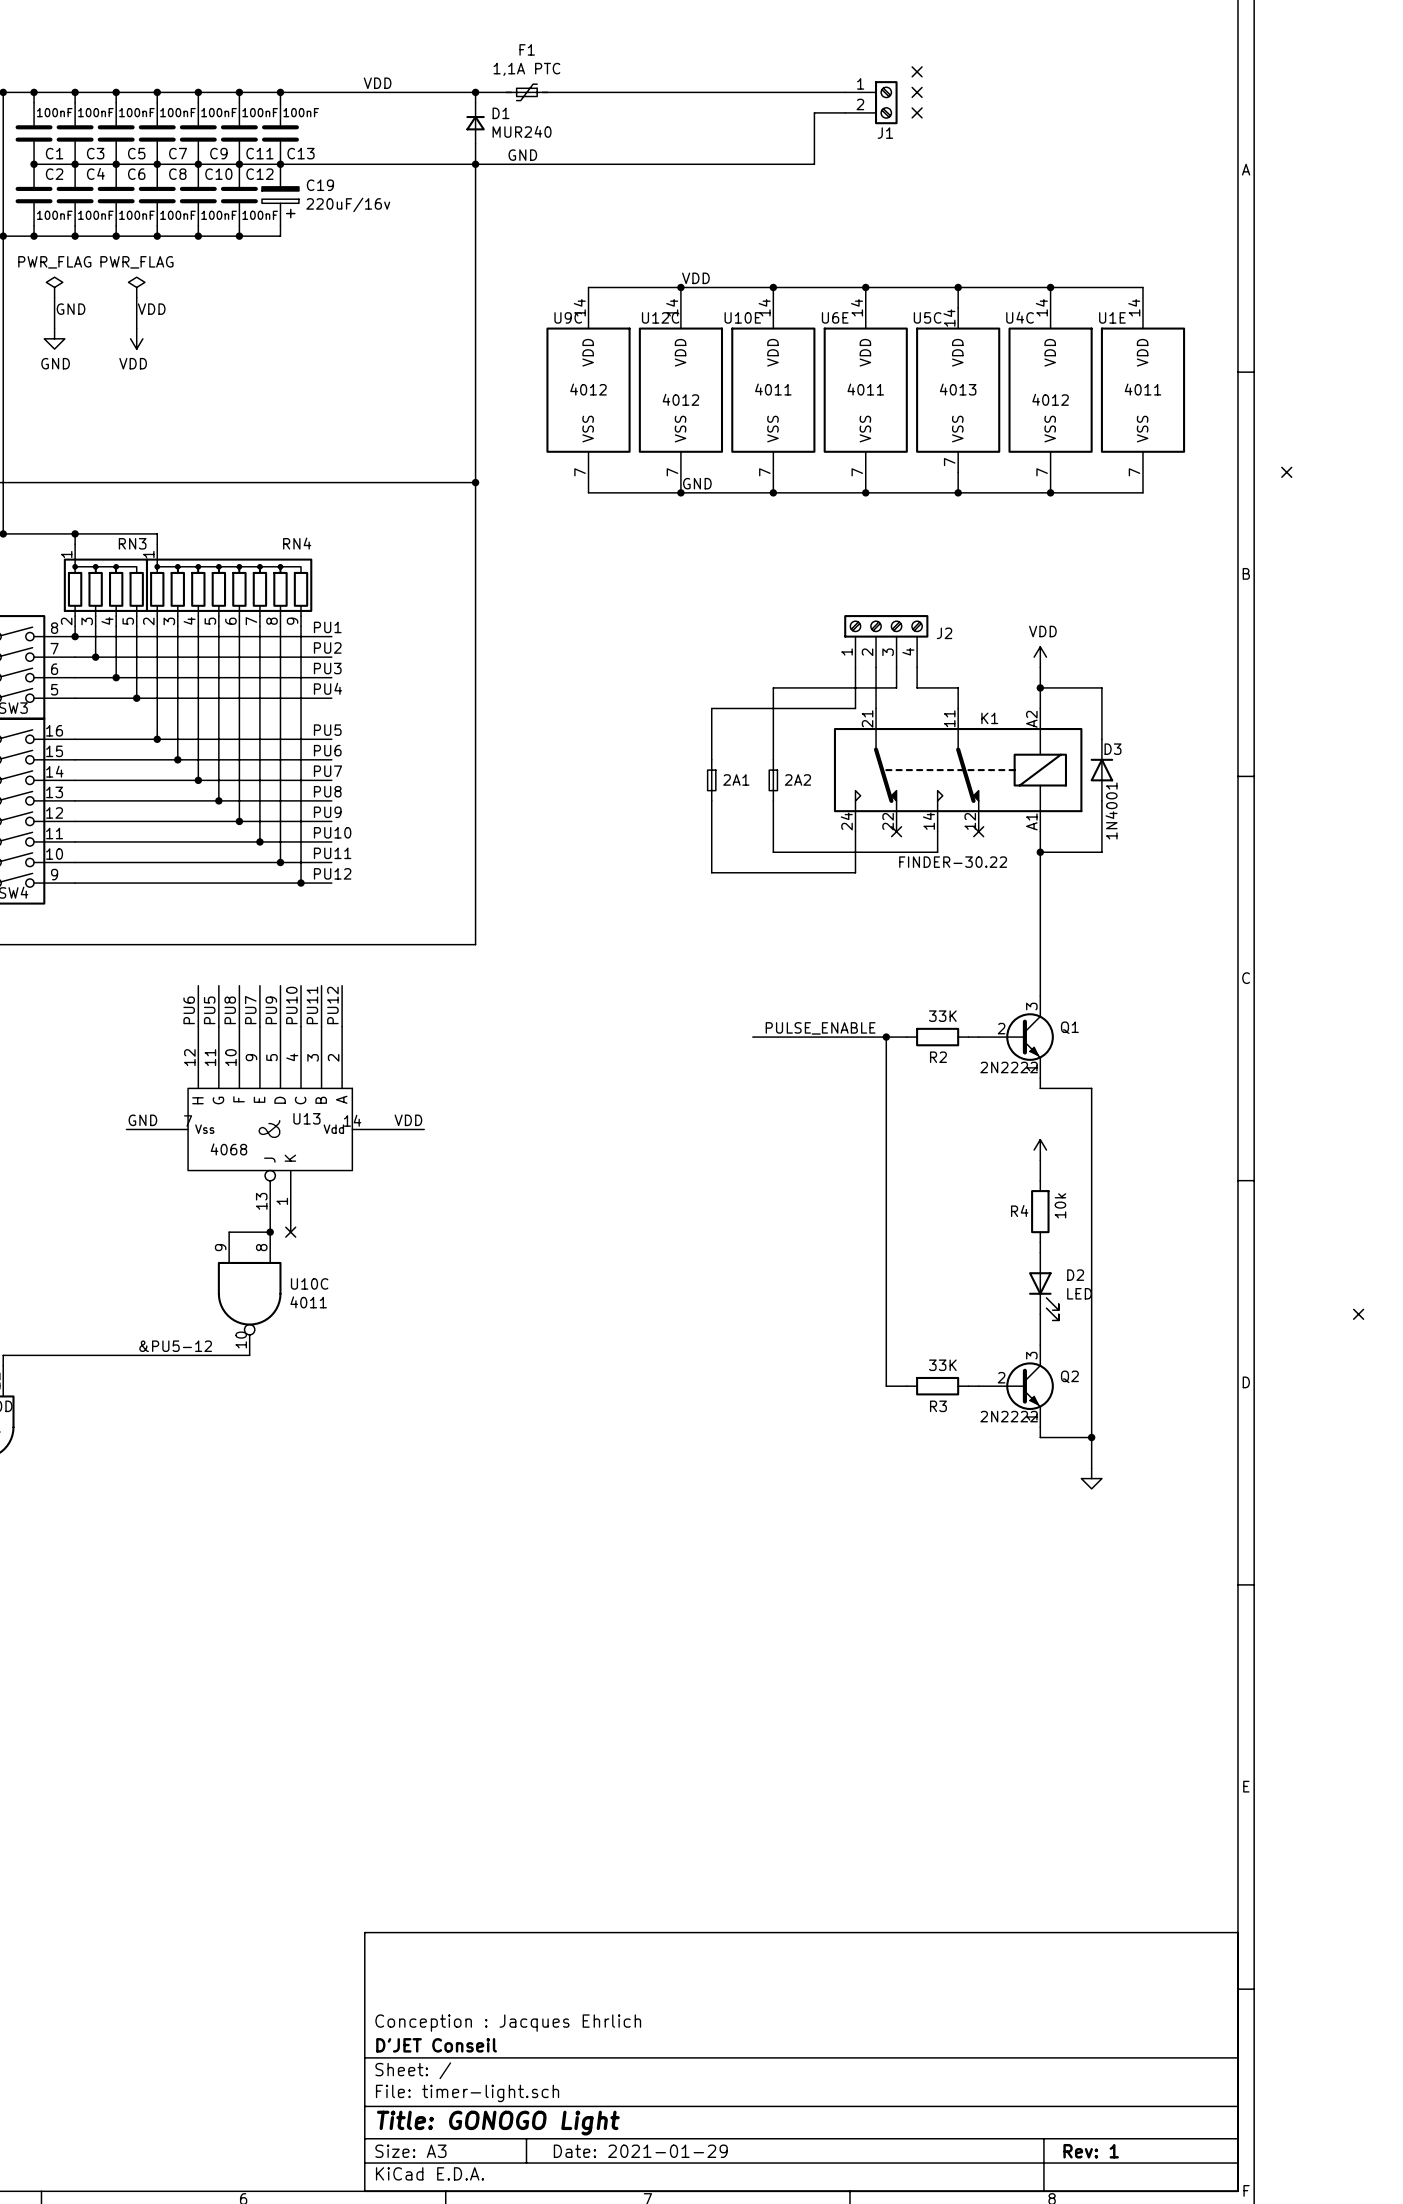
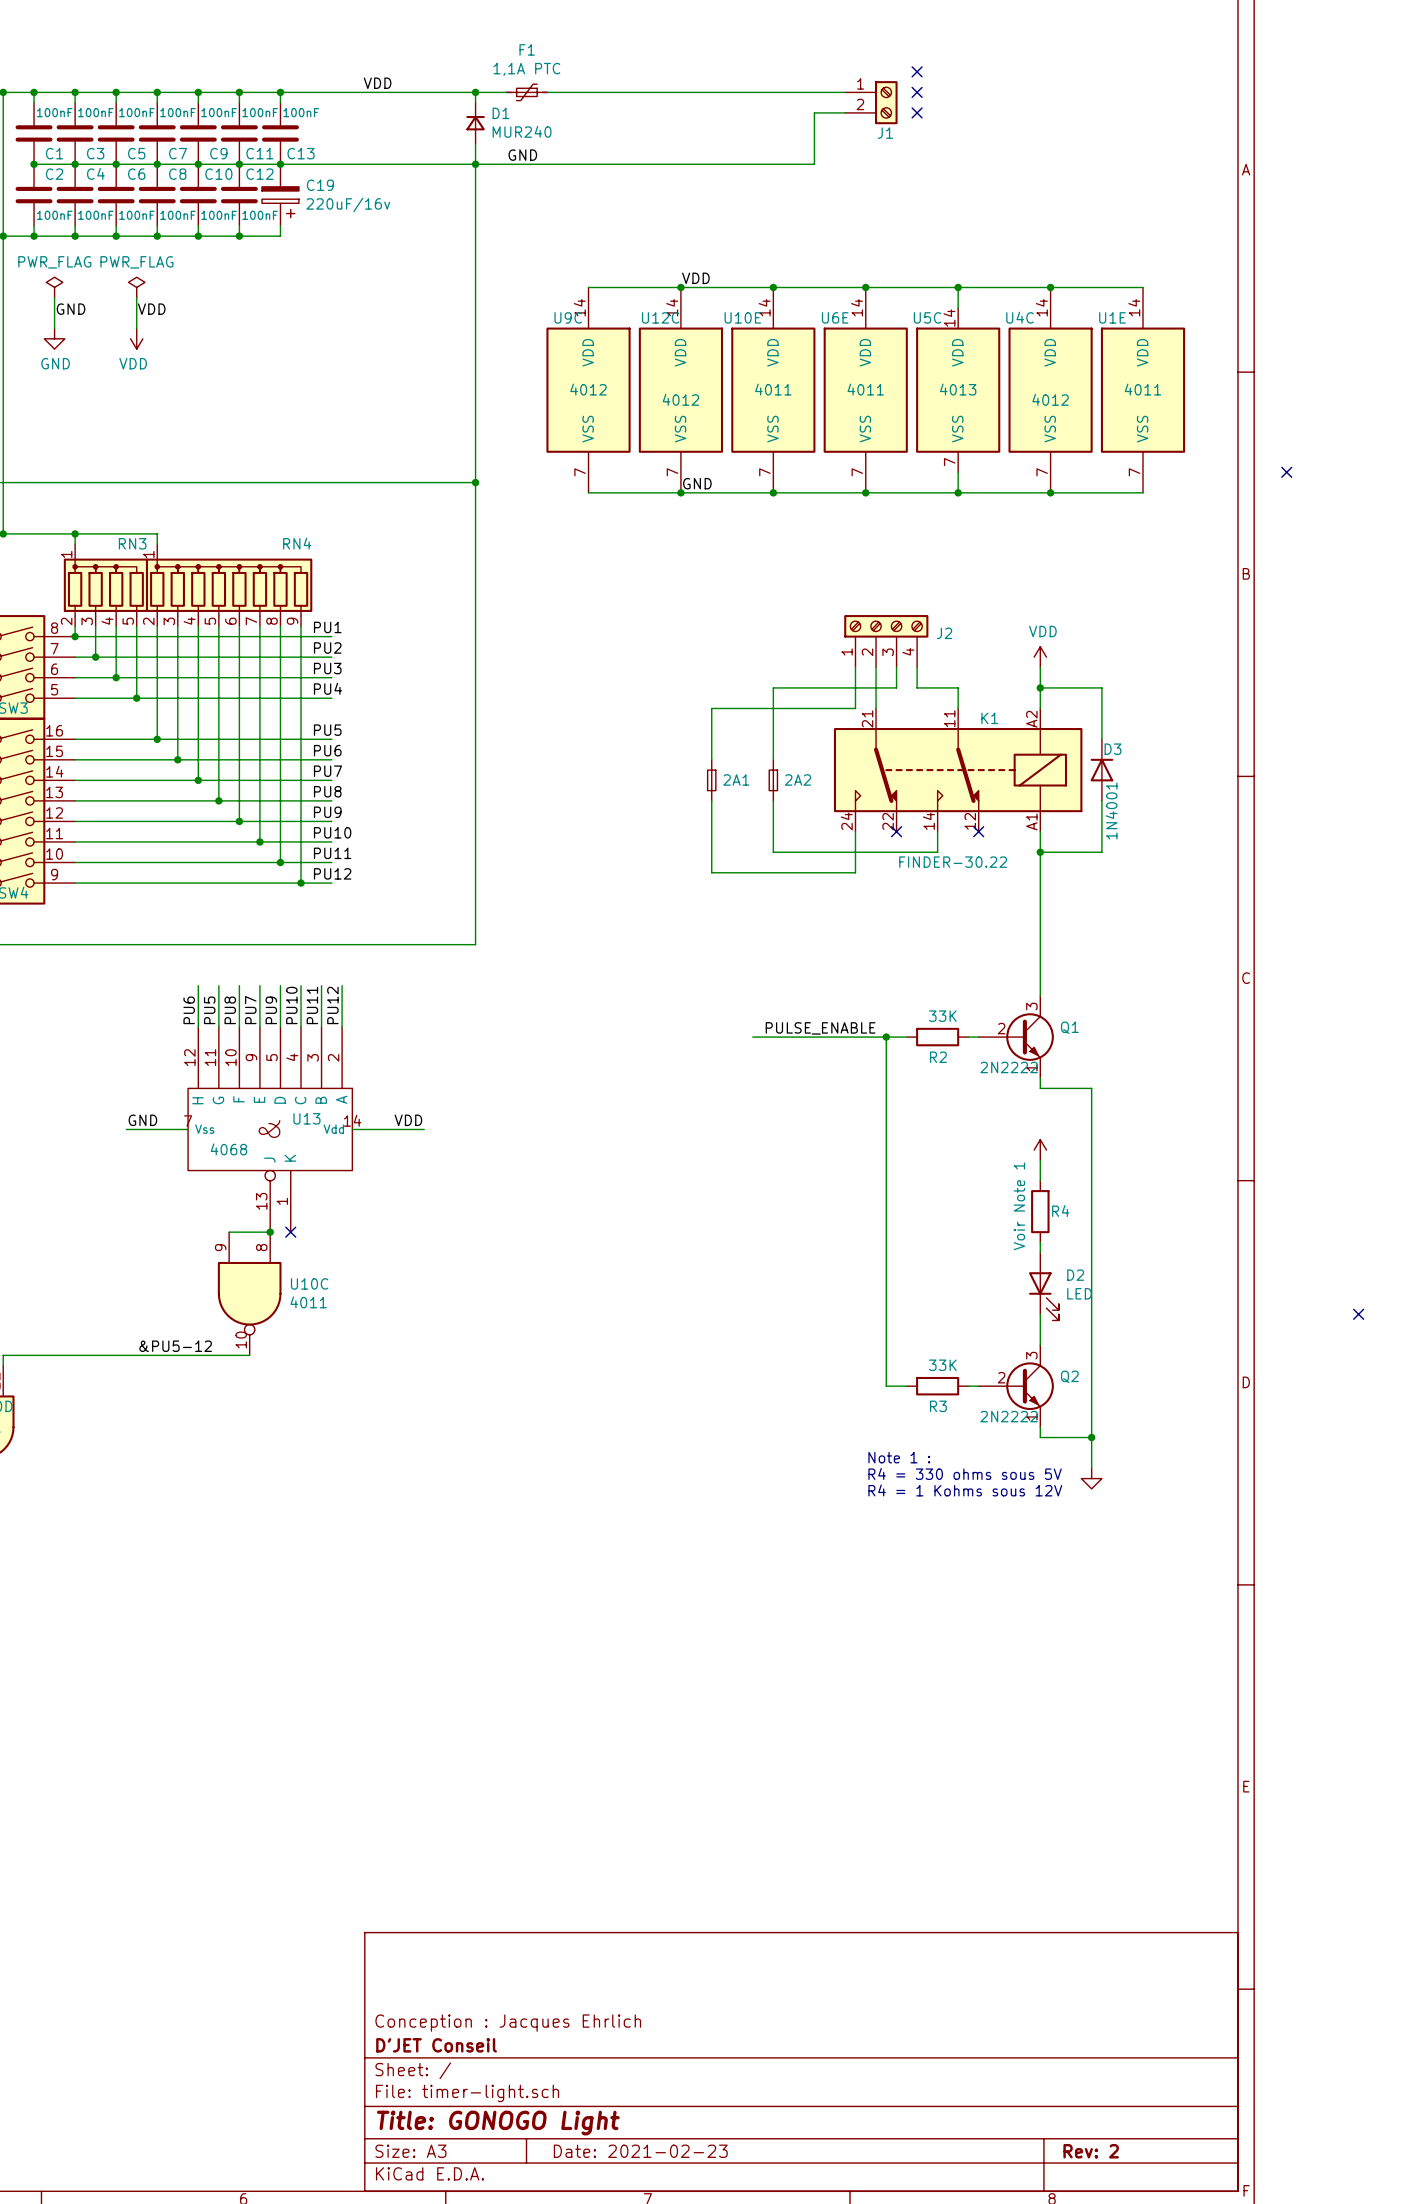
R4 value: 10k (1060, 1205) -> Voir Note 1 (1019, 1206)
R4 name position: R4 (1019, 1210) -> R4 (1060, 1210)
text: none -> Note 1 : (899, 1457)
text: none -> R4 = 330 ohms sous 5V (965, 1473)
text: none -> R4 = 1 Kohms sous 12V (965, 1490)
title block: Date: 2021-01-29 (640, 2151) -> Date: 2021-02-23 (640, 2151)
title block: Rev: 1 (1091, 2151) -> Rev: 2 (1091, 2151)

